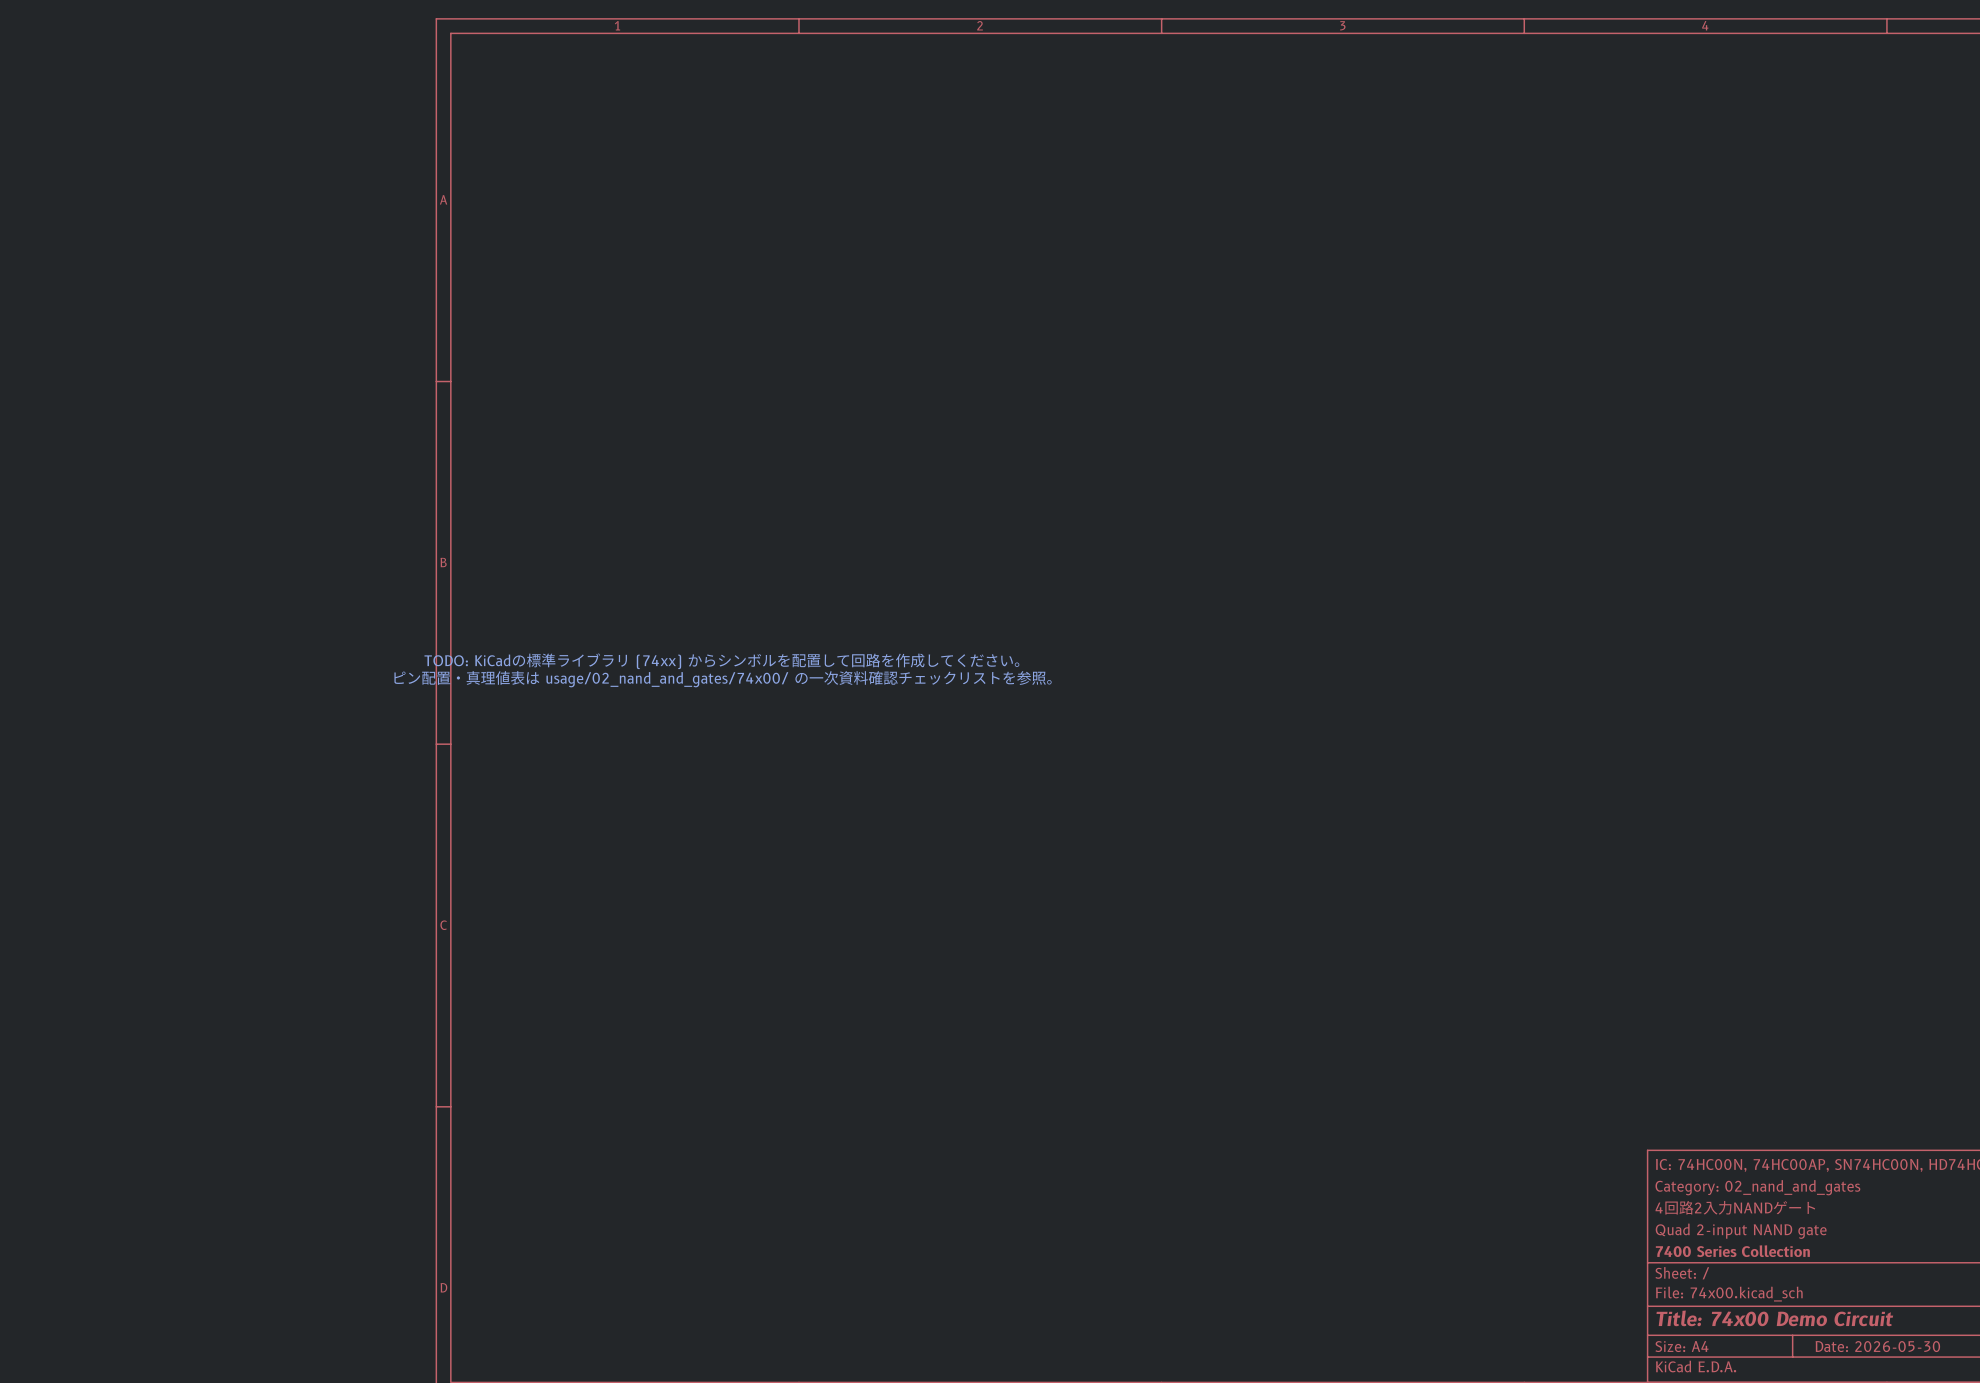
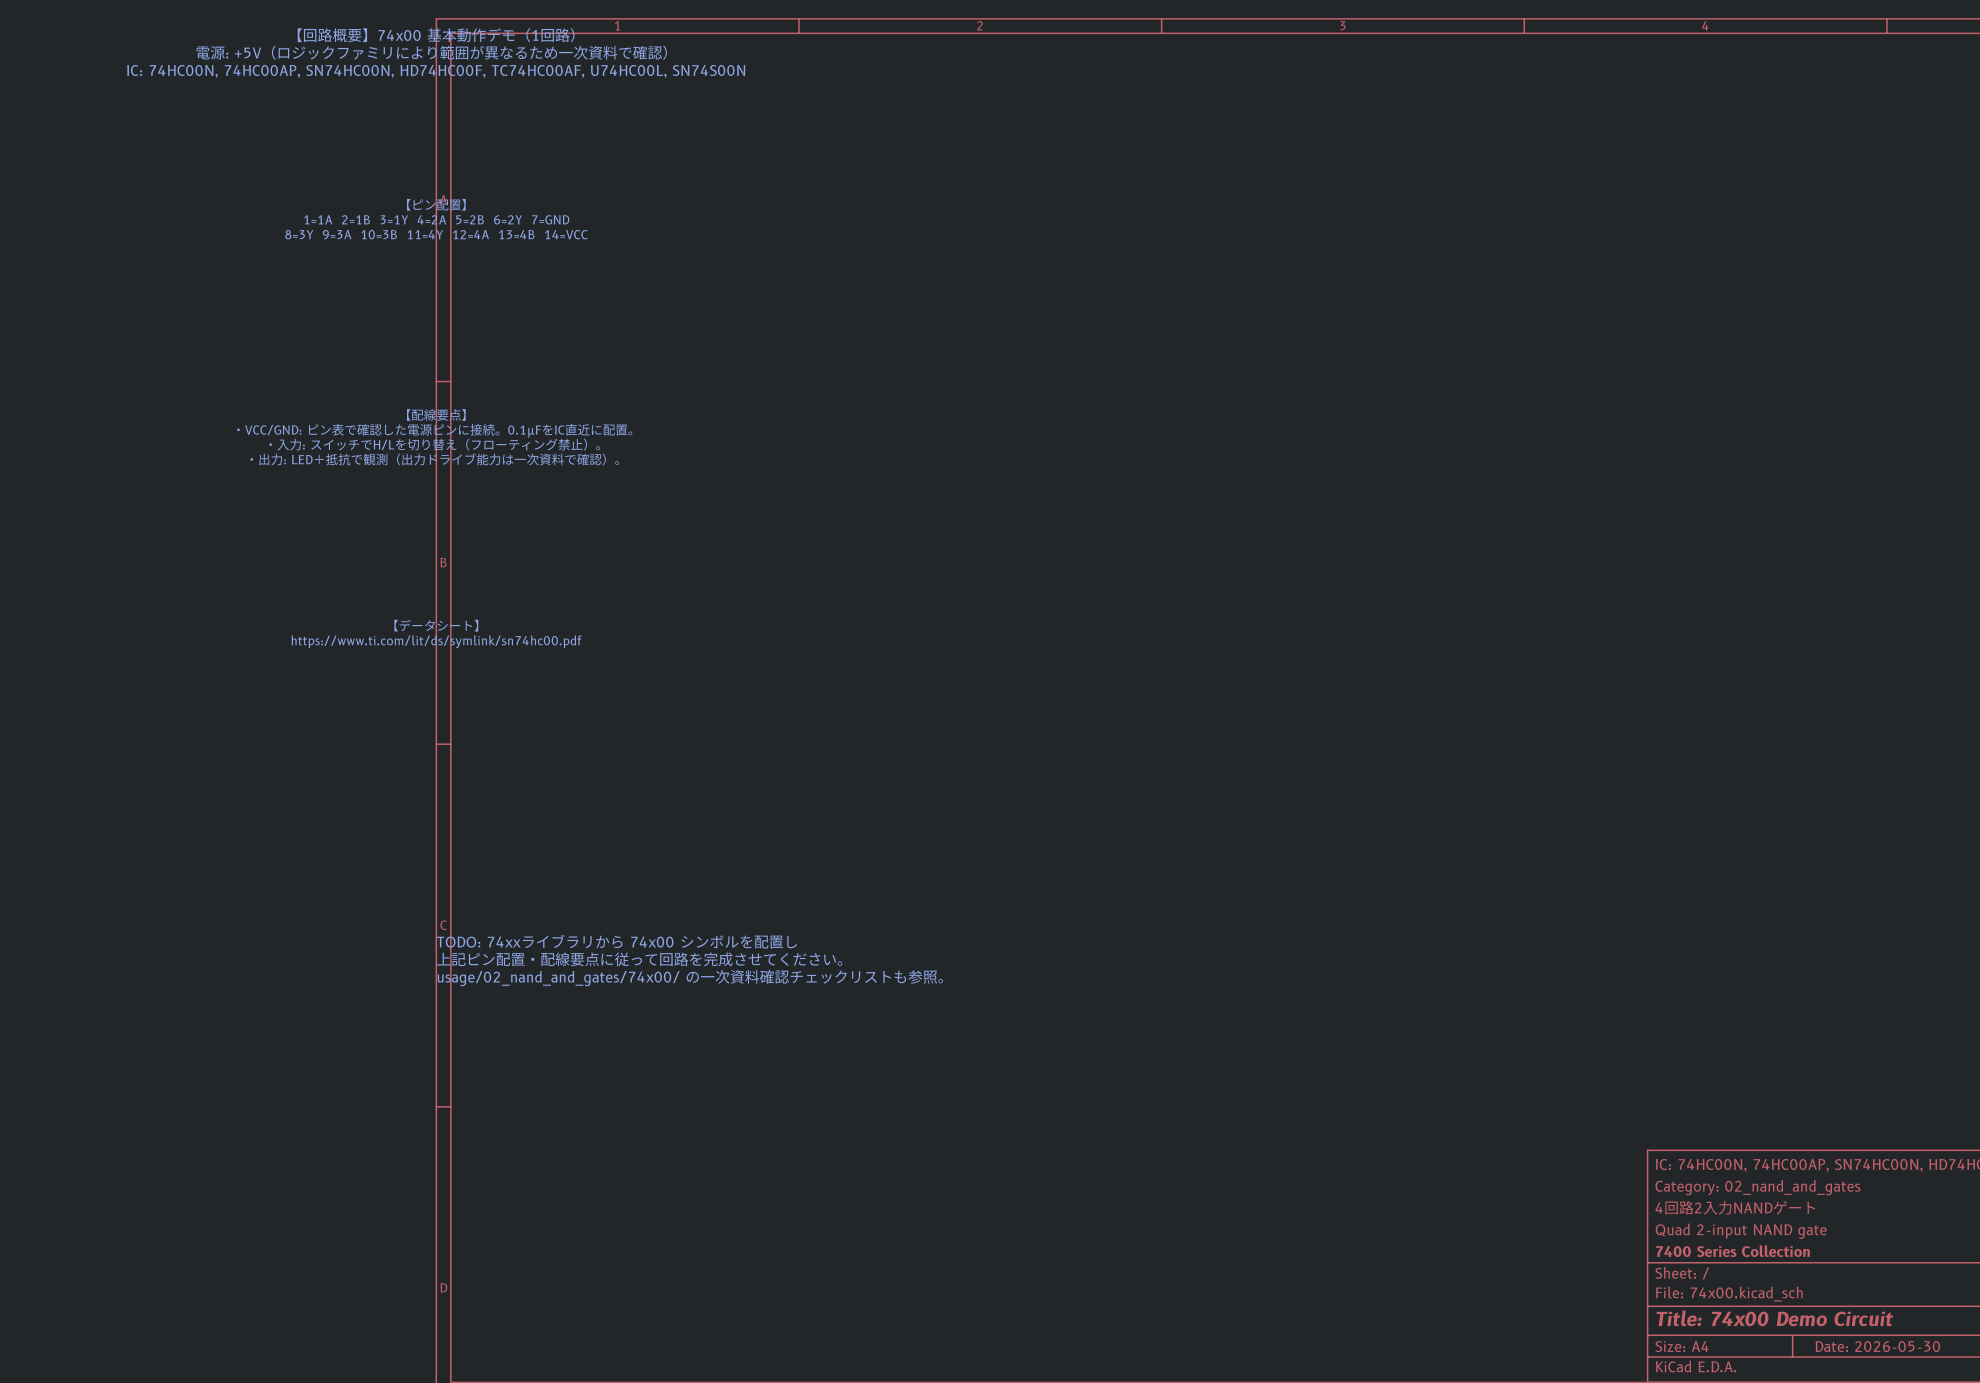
text: none -> 【回路概要】74x00 基本動作デモ（1回路） (436, 35)
text: none -> 電源: +5V（ロジックファミリにより範囲が異なるため一次資料で確認） (431, 52)
text: none -> IC: 74HC00N, 74HC00AP, SN74HC00N, HD74HC00F, TC74HC00AF, U74HC00L, SN74S00N (436, 71)
text: none -> 【ピン配置】 (436, 204)
text: none -> 1=1A 2=1B 3=1Y 4=2A 5=2B 6=2Y 7=GND (436, 219)
text: none -> 8=3Y 9=3A 10=3B 11=4Y 12=4A 13=4B 14=VCC (436, 234)
text: none -> 【配線要点】 (436, 414)
text: none -> ・VCC/GND: ピン表で確認した電源ピンに接続。0.1µFをIC直近に配置。 (434, 430)
text: none -> ・入力: スイッチでH/Lを切り替え（フローティング禁止）。 (434, 444)
text: none -> ・出力: LED＋抵抗で観測（出力ドライブ能力は一次資料で確認）。 (434, 459)
text: none -> 【データシート】 (436, 625)
text: none -> https://www.ti.com/lit/ds/symlink/sn74hc00.pdf (436, 641)
text: TODO: KiCadの標準ライブラリ (74xx) からシンボルを配置して回路を作成してください。 (721, 661) -> none
text: ピン配置・真理値表は usage/02_nand_and_gates/74x00/ の一次資料確認チェックリストを参照。 (722, 679) -> none
text: none -> TODO: 74xxライブラリから 74x00 シンボルを配置し (616, 941)
text: none -> 上記ピン配置・配線要点に従って回路を完成させてください。 (639, 959)
text: none -> usage/02_nand_and_gates/74x00/ の一次資料確認チェックリストも参照。 (690, 978)

